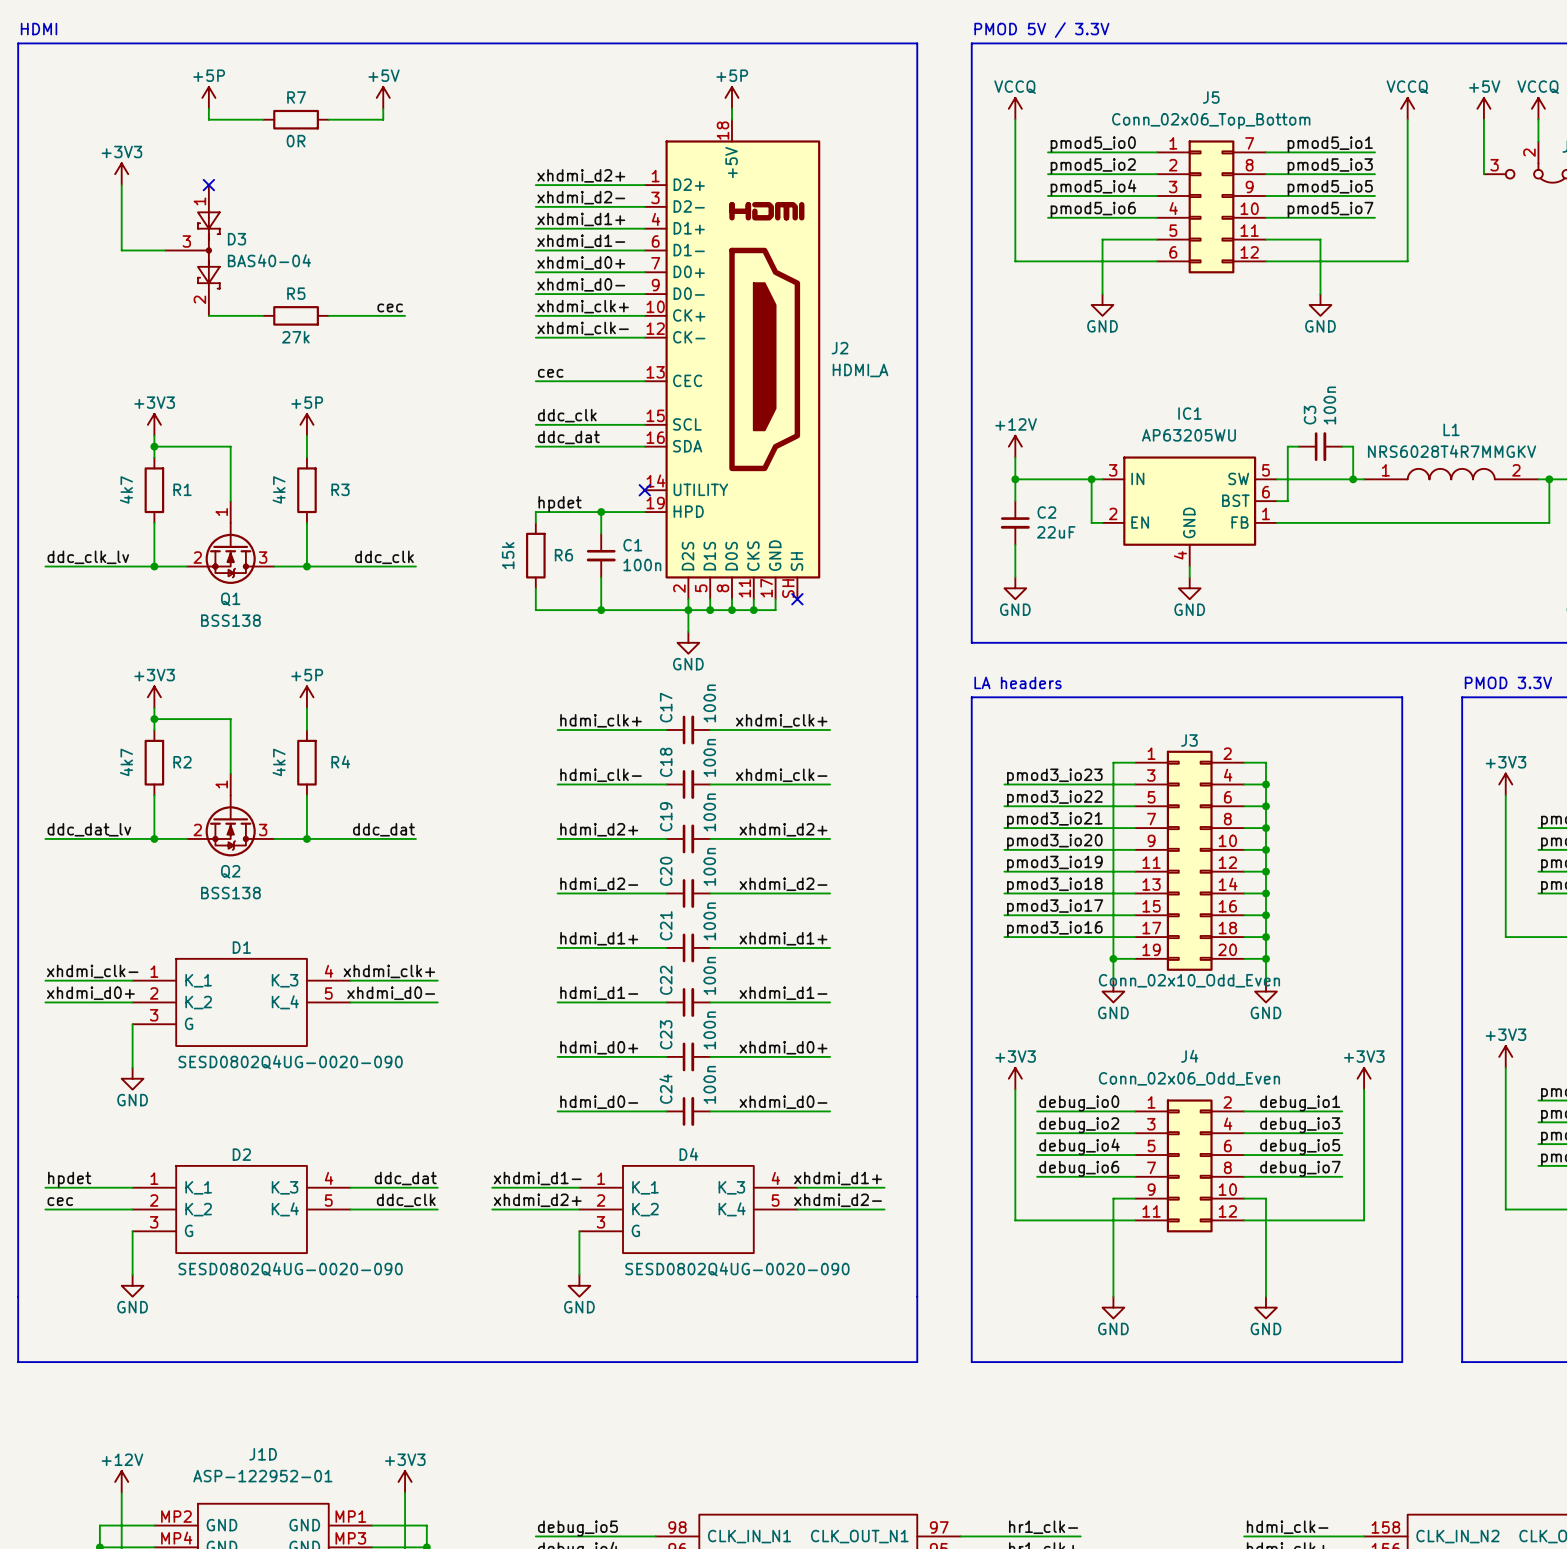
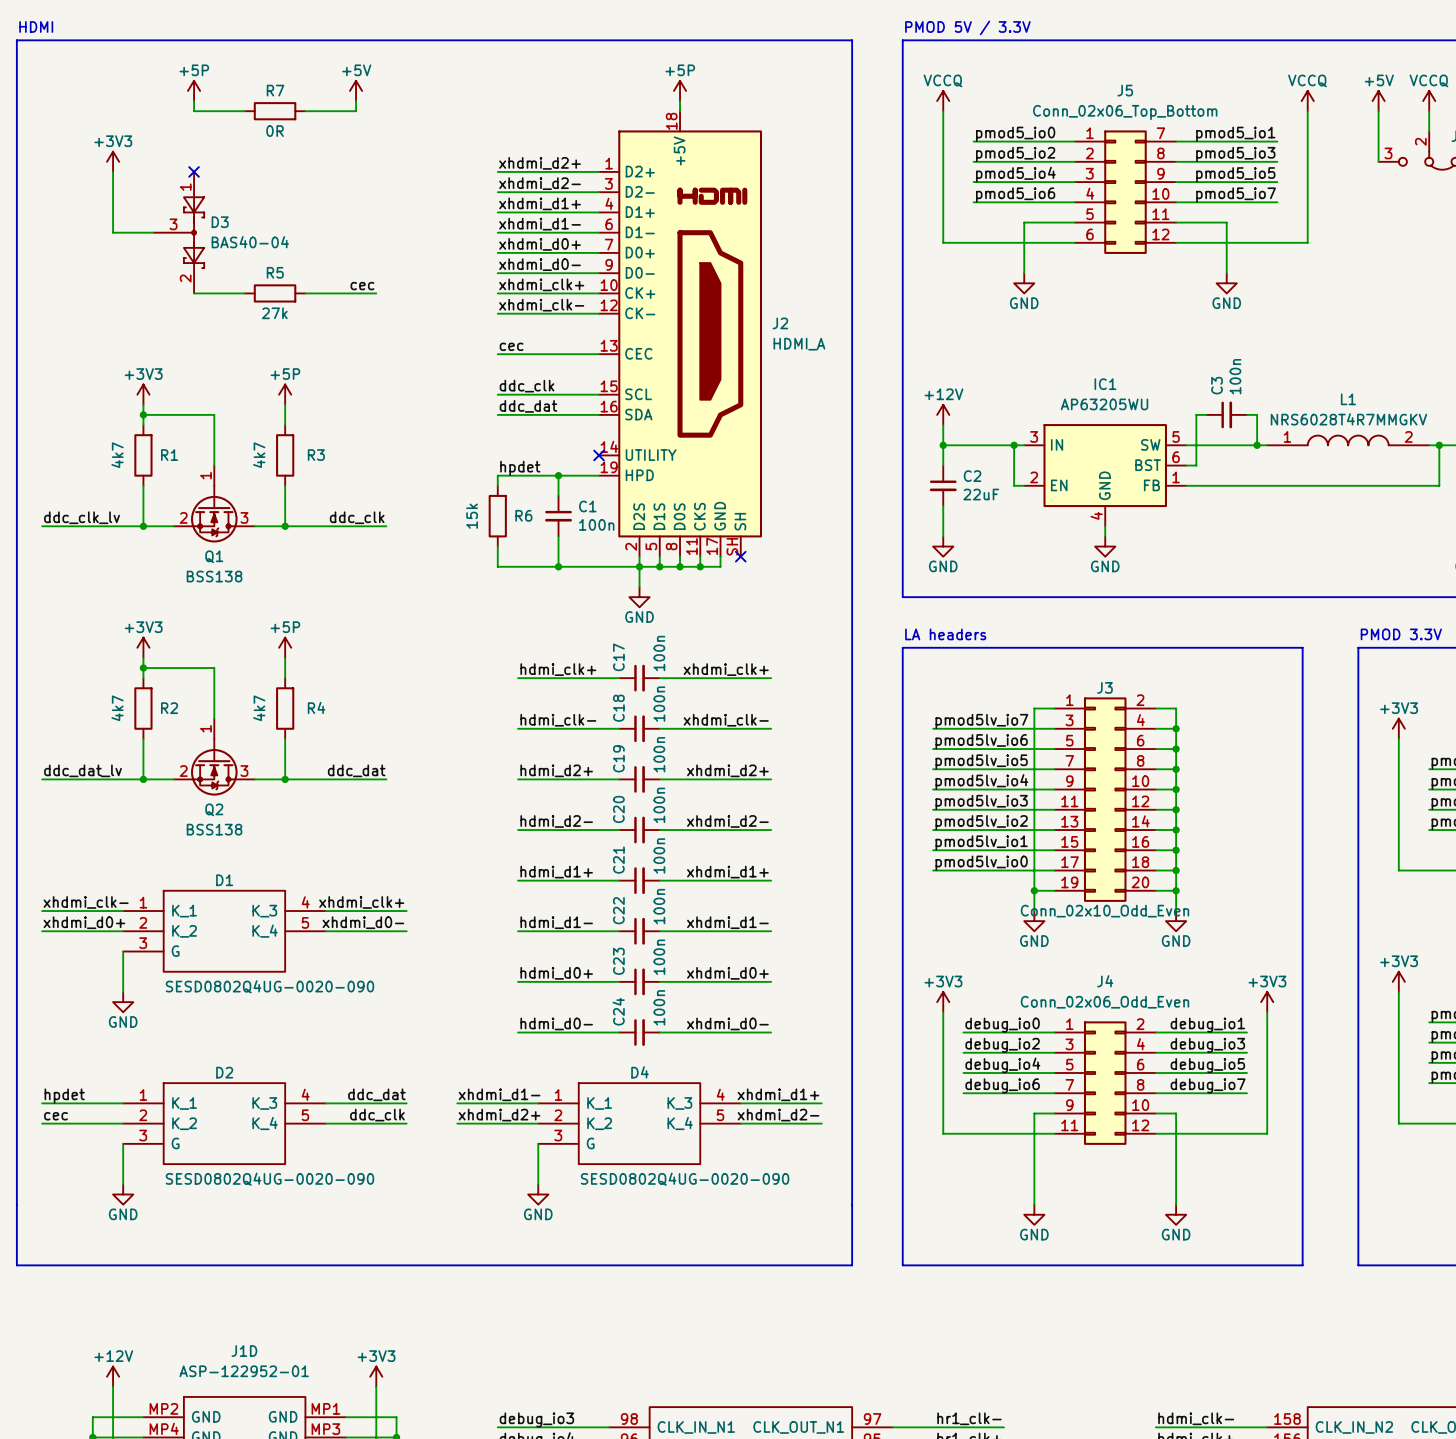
label: pmod3_io23 (1054, 776) -> pmod5lv_io7 (981, 721)
label: pmod3_io22 (1054, 798) -> pmod5lv_io6 (981, 741)
label: pmod3_io21 (1054, 820) -> pmod5lv_io5 (981, 761)
label: pmod3_io20 (1054, 841) -> pmod5lv_io4 (981, 781)
label: pmod3_io19 (1054, 863) -> pmod5lv_io3 (981, 802)
label: pmod3_io18 (1054, 885) -> pmod5lv_io2 (981, 822)
label: pmod3_io17 (1055, 907) -> pmod5lv_io1 (981, 842)
label: pmod3_io16 (1054, 929) -> pmod5lv_io0 (981, 863)
label: debug_io5 (577, 1528) -> debug_io3 (536, 1420)

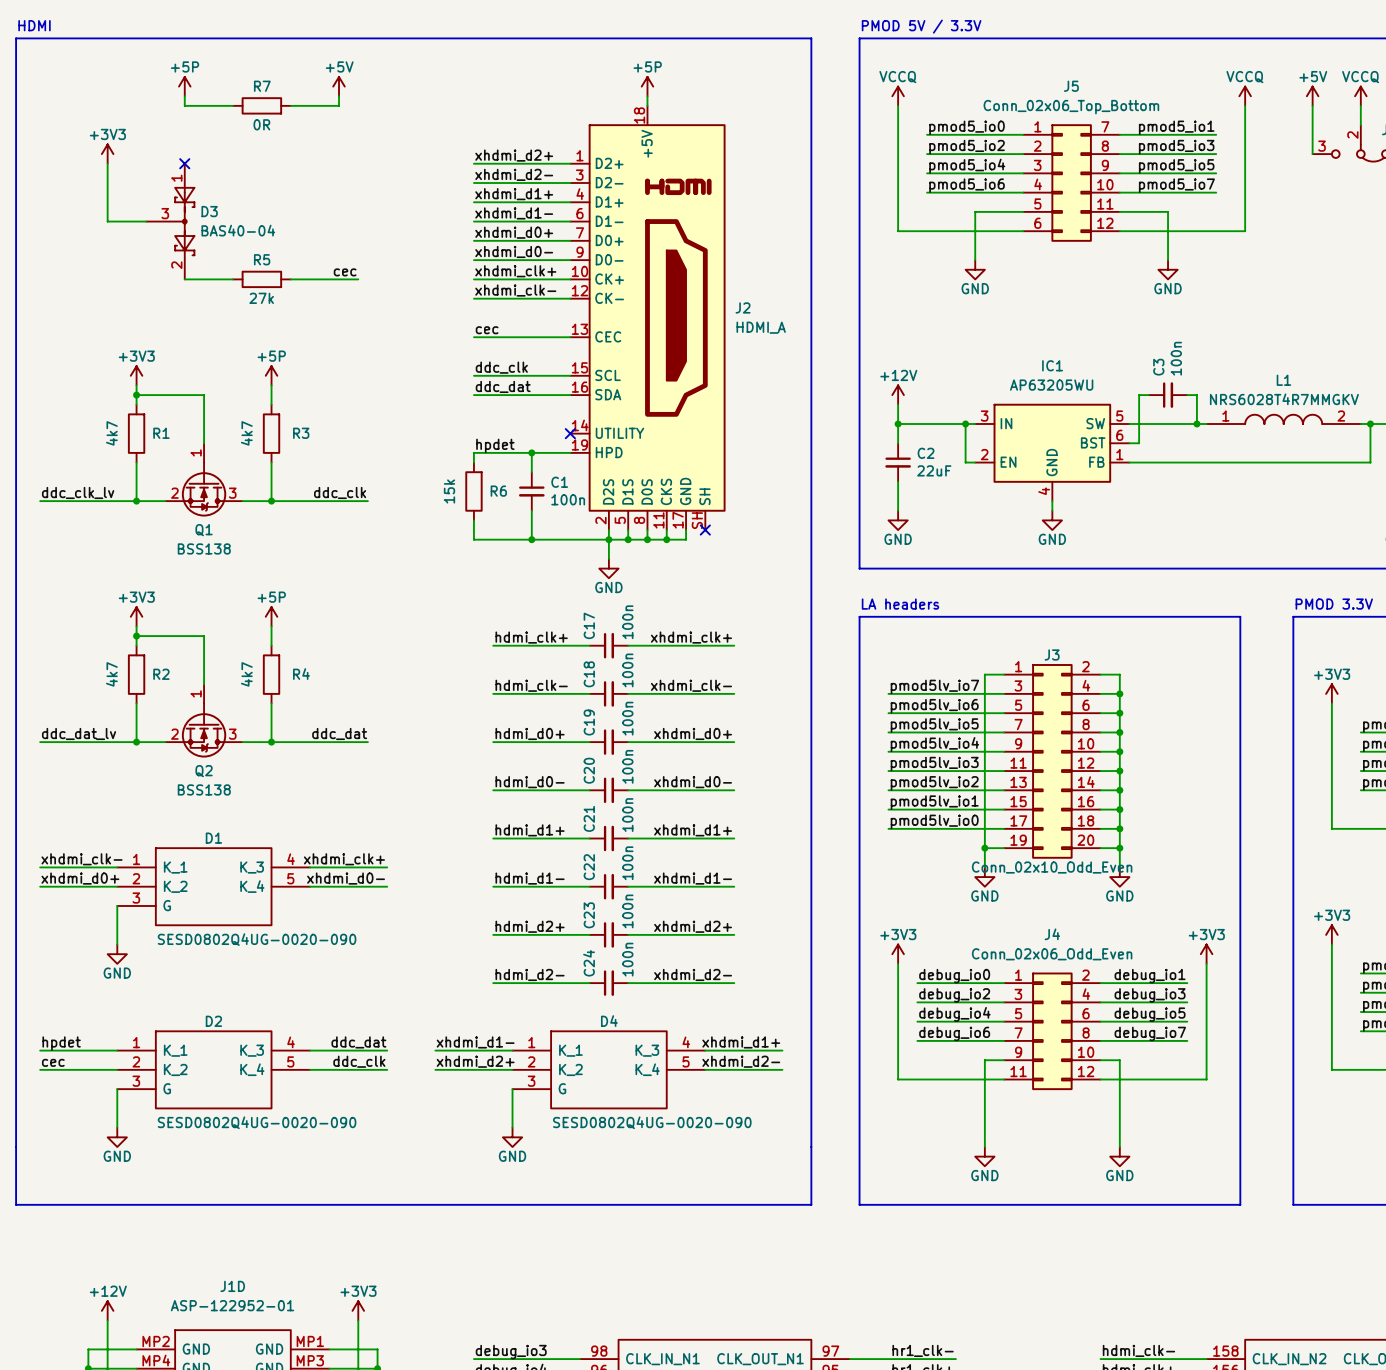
label: hdmi_d2+ (556, 770) -> hdmi_d0+ (530, 733)
label: xhdmi_d2+ (727, 770) -> xhdmi_d0+ (693, 733)
label: hdmi_d2- (556, 821) -> hdmi_d0- (530, 782)
label: xhdmi_d2- (727, 821) -> xhdmi_d0- (693, 782)
label: hdmi_d0+ (556, 973) -> hdmi_d2+ (530, 926)
label: xhdmi_d0+ (727, 973) -> xhdmi_d2+ (693, 926)
label: hdmi_d0- (556, 1023) -> hdmi_d2- (530, 974)
label: xhdmi_d0- (727, 1023) -> xhdmi_d2- (693, 974)

